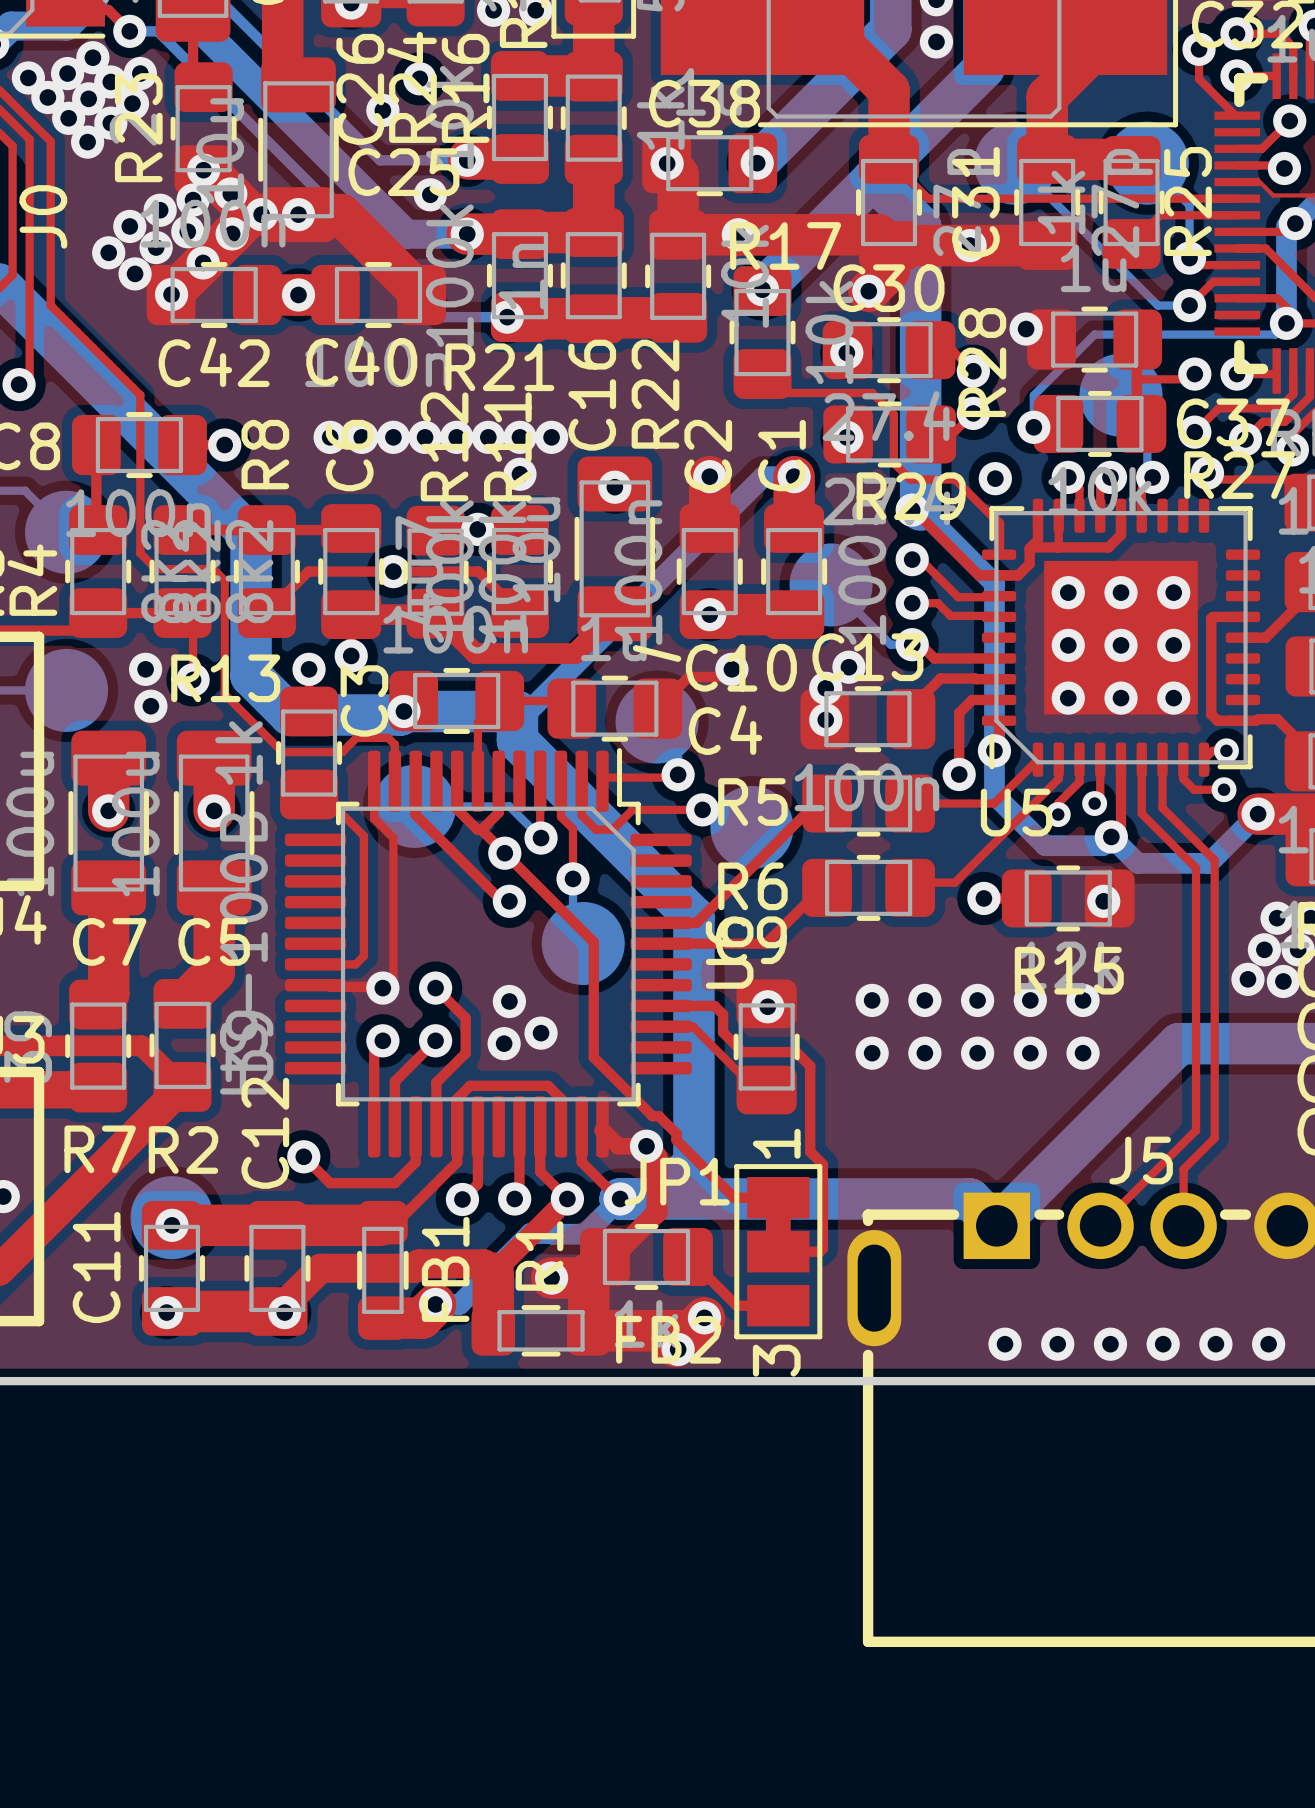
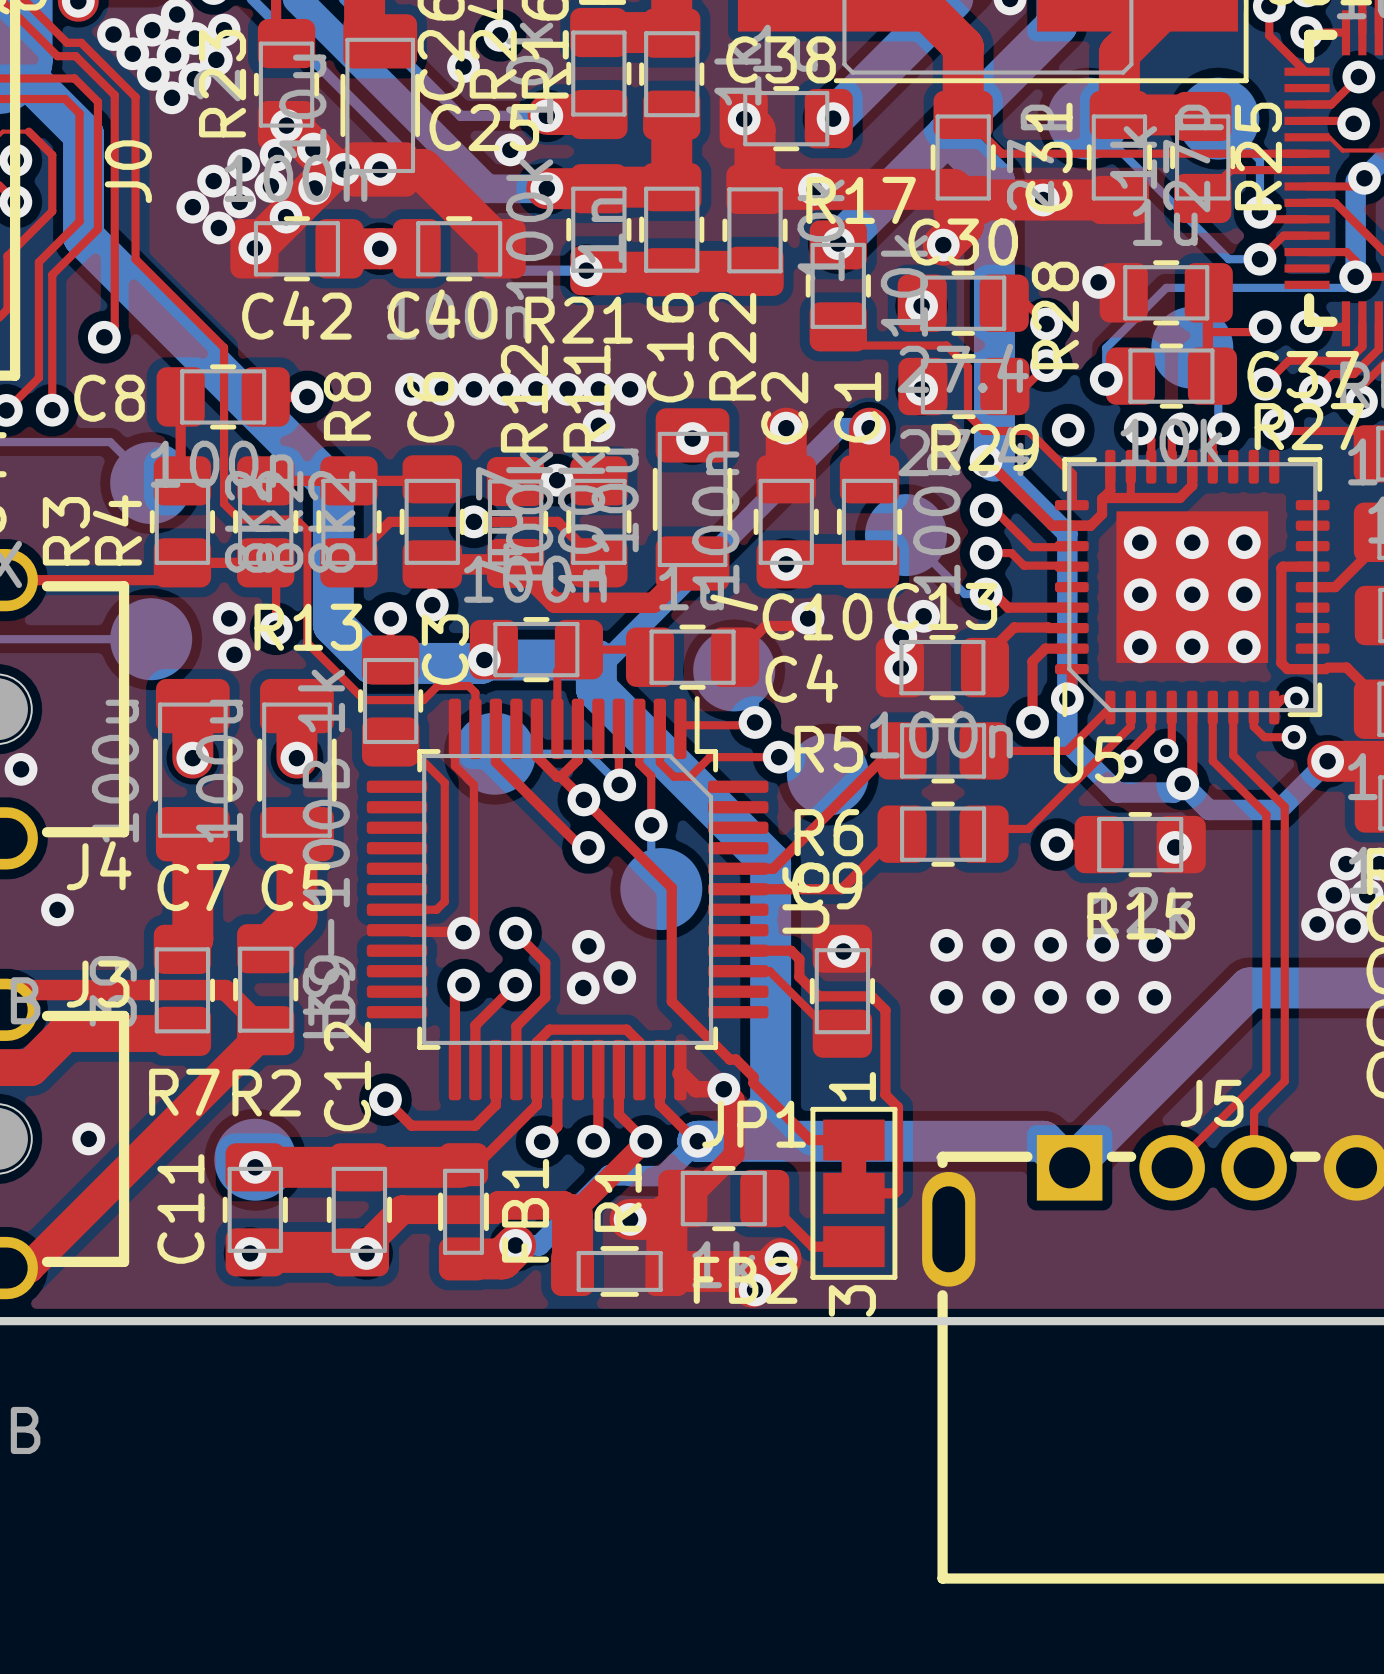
via: (1005, 1344) -> none
via: (1057, 1344) -> none
via: (1110, 1344) -> none
via: (1163, 1344) -> none
via: (1215, 1344) -> none
via: (1268, 1344) -> none

